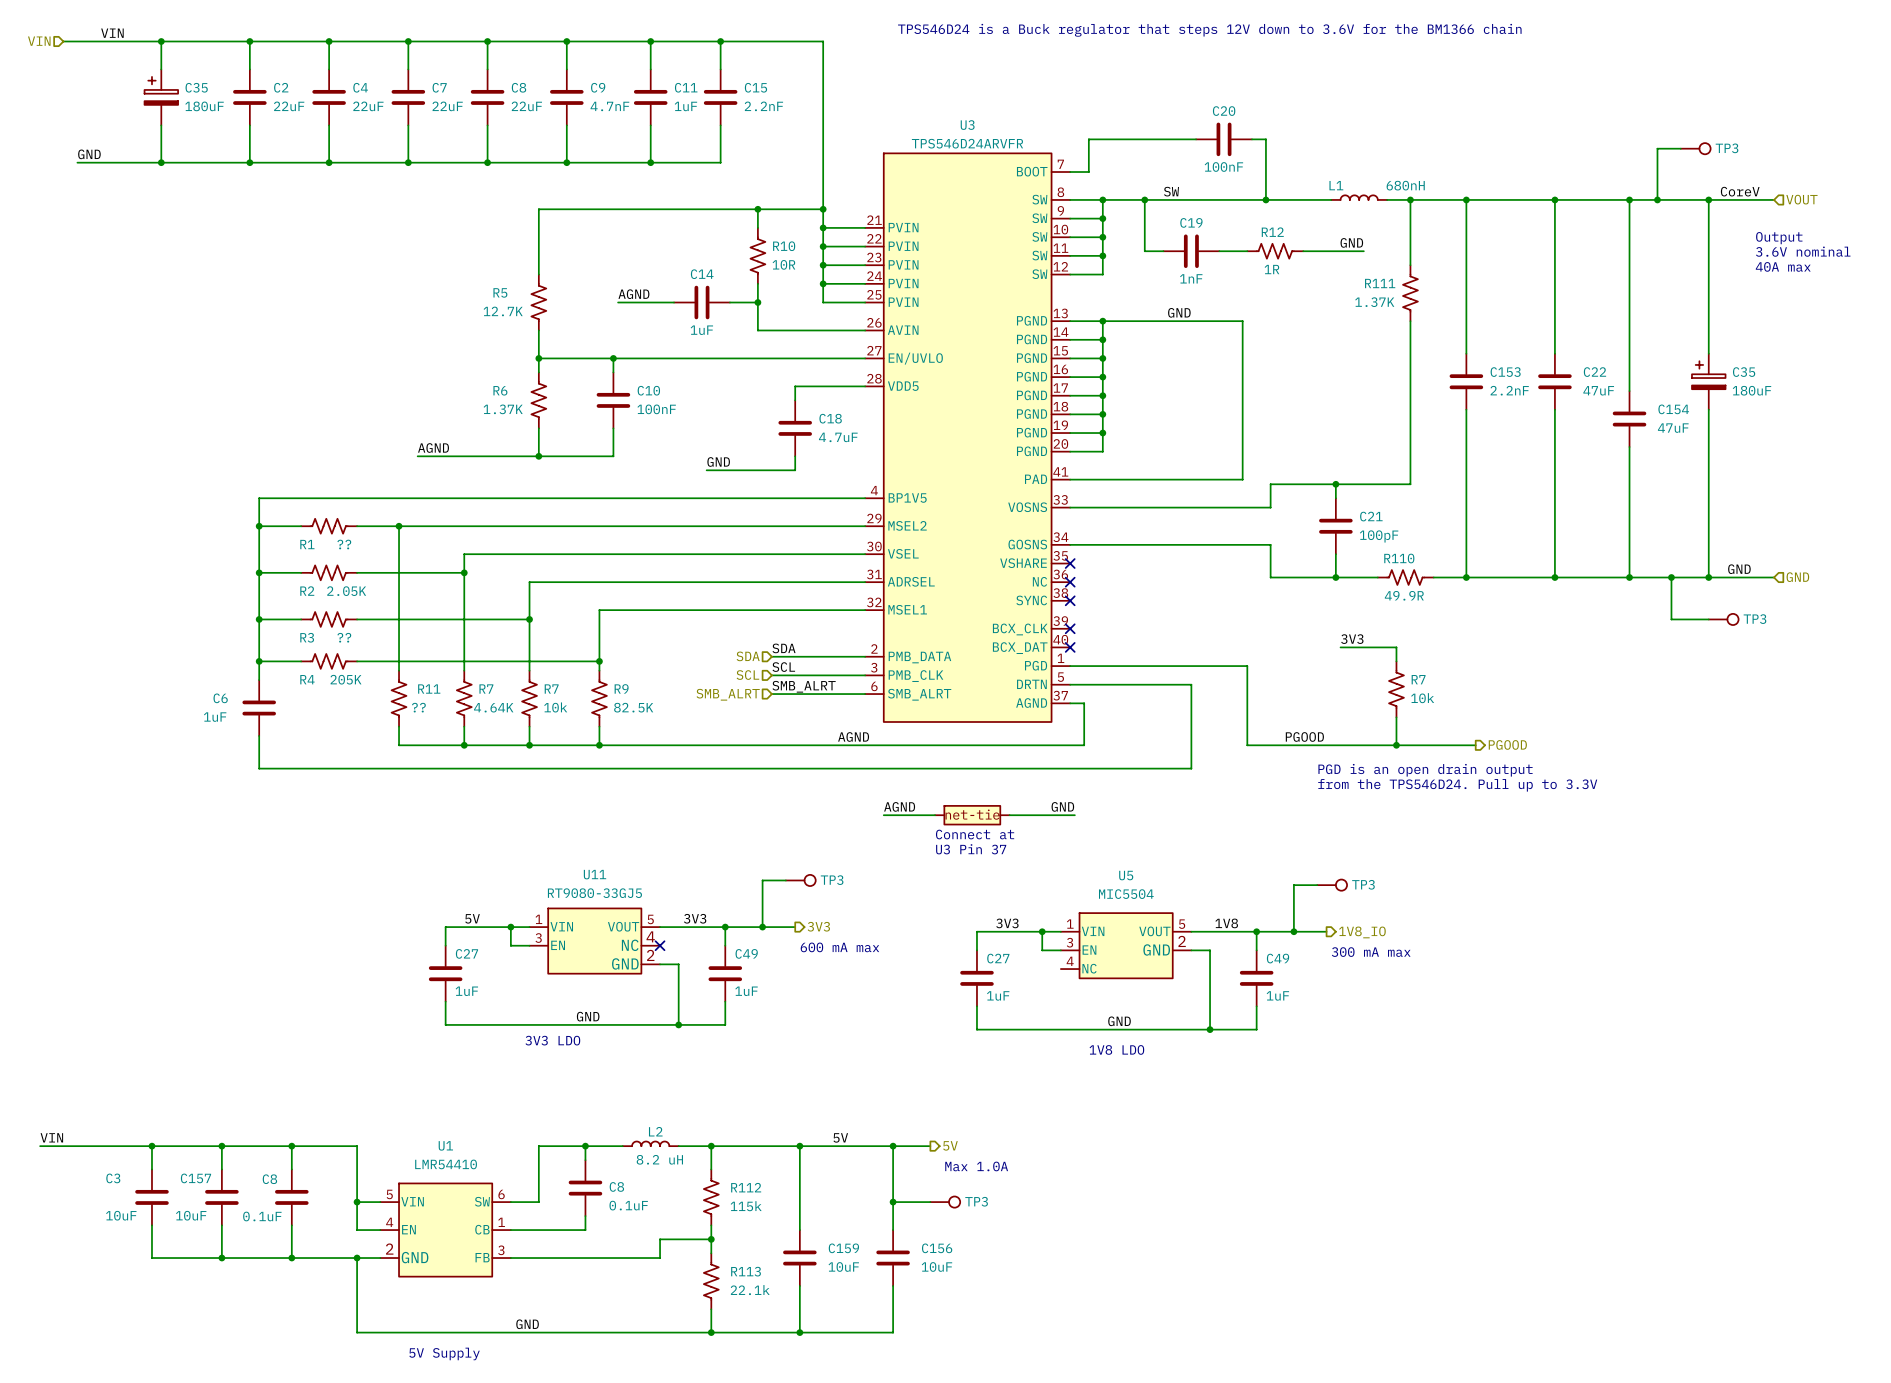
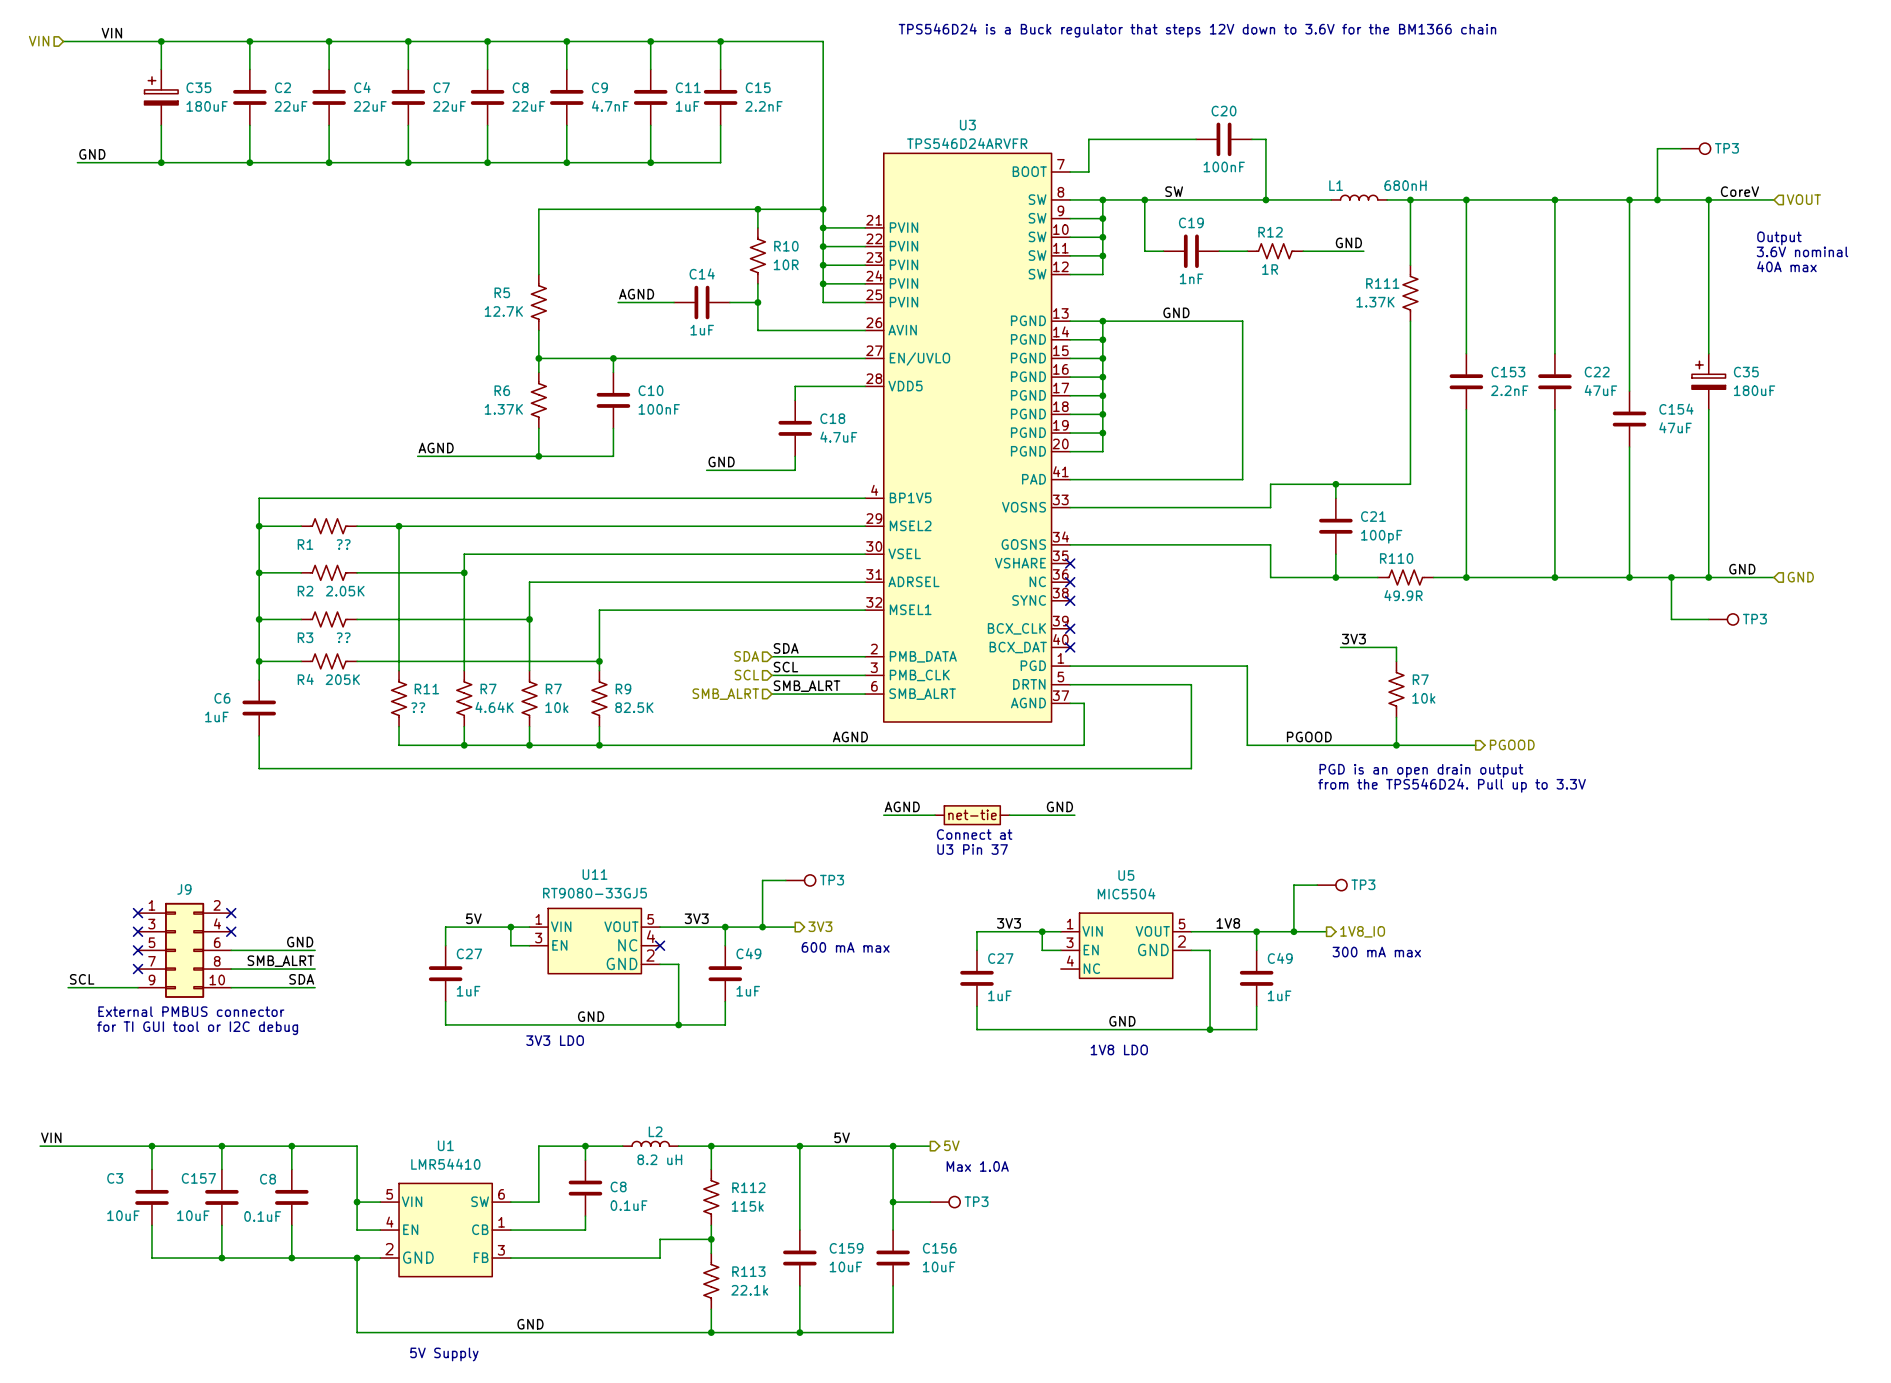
no-connect mark: none -> (138, 913)
no-connect mark: none -> (231, 913)
no-connect mark: none -> (138, 931)
no-connect mark: none -> (231, 931)
label: none -> GND (300, 942)
no-connect mark: none -> (138, 950)
J9: none -> (184, 950)
wire: none -> (231, 950) (315, 950)
label: none -> SMB_ALRT (280, 961)
no-connect mark: none -> (138, 969)
wire: none -> (231, 969) (315, 969)
label: none -> SCL (82, 979)
label: none -> SDA (301, 979)
wire: none -> (68, 987) (138, 987)
wire: none -> (231, 987) (315, 987)
text: none -> External PMBUS connector (191, 1011)
text: none -> for TI GUI tool or I2C debug (197, 1028)

